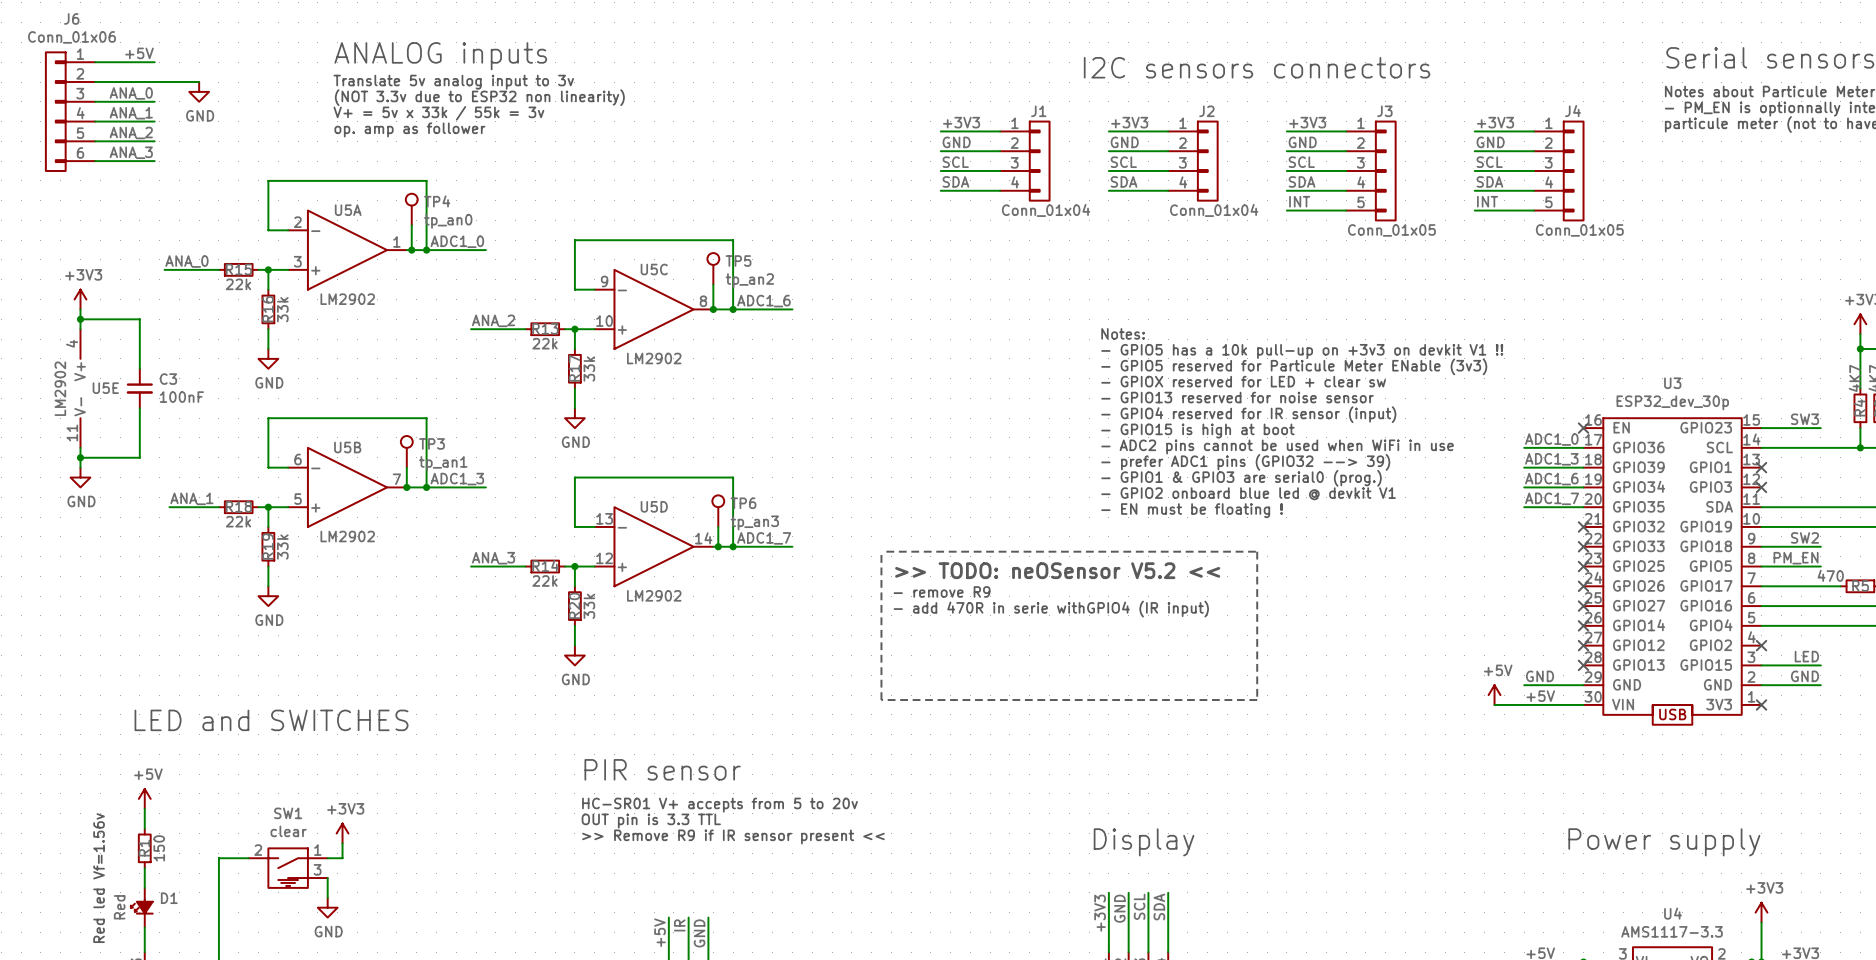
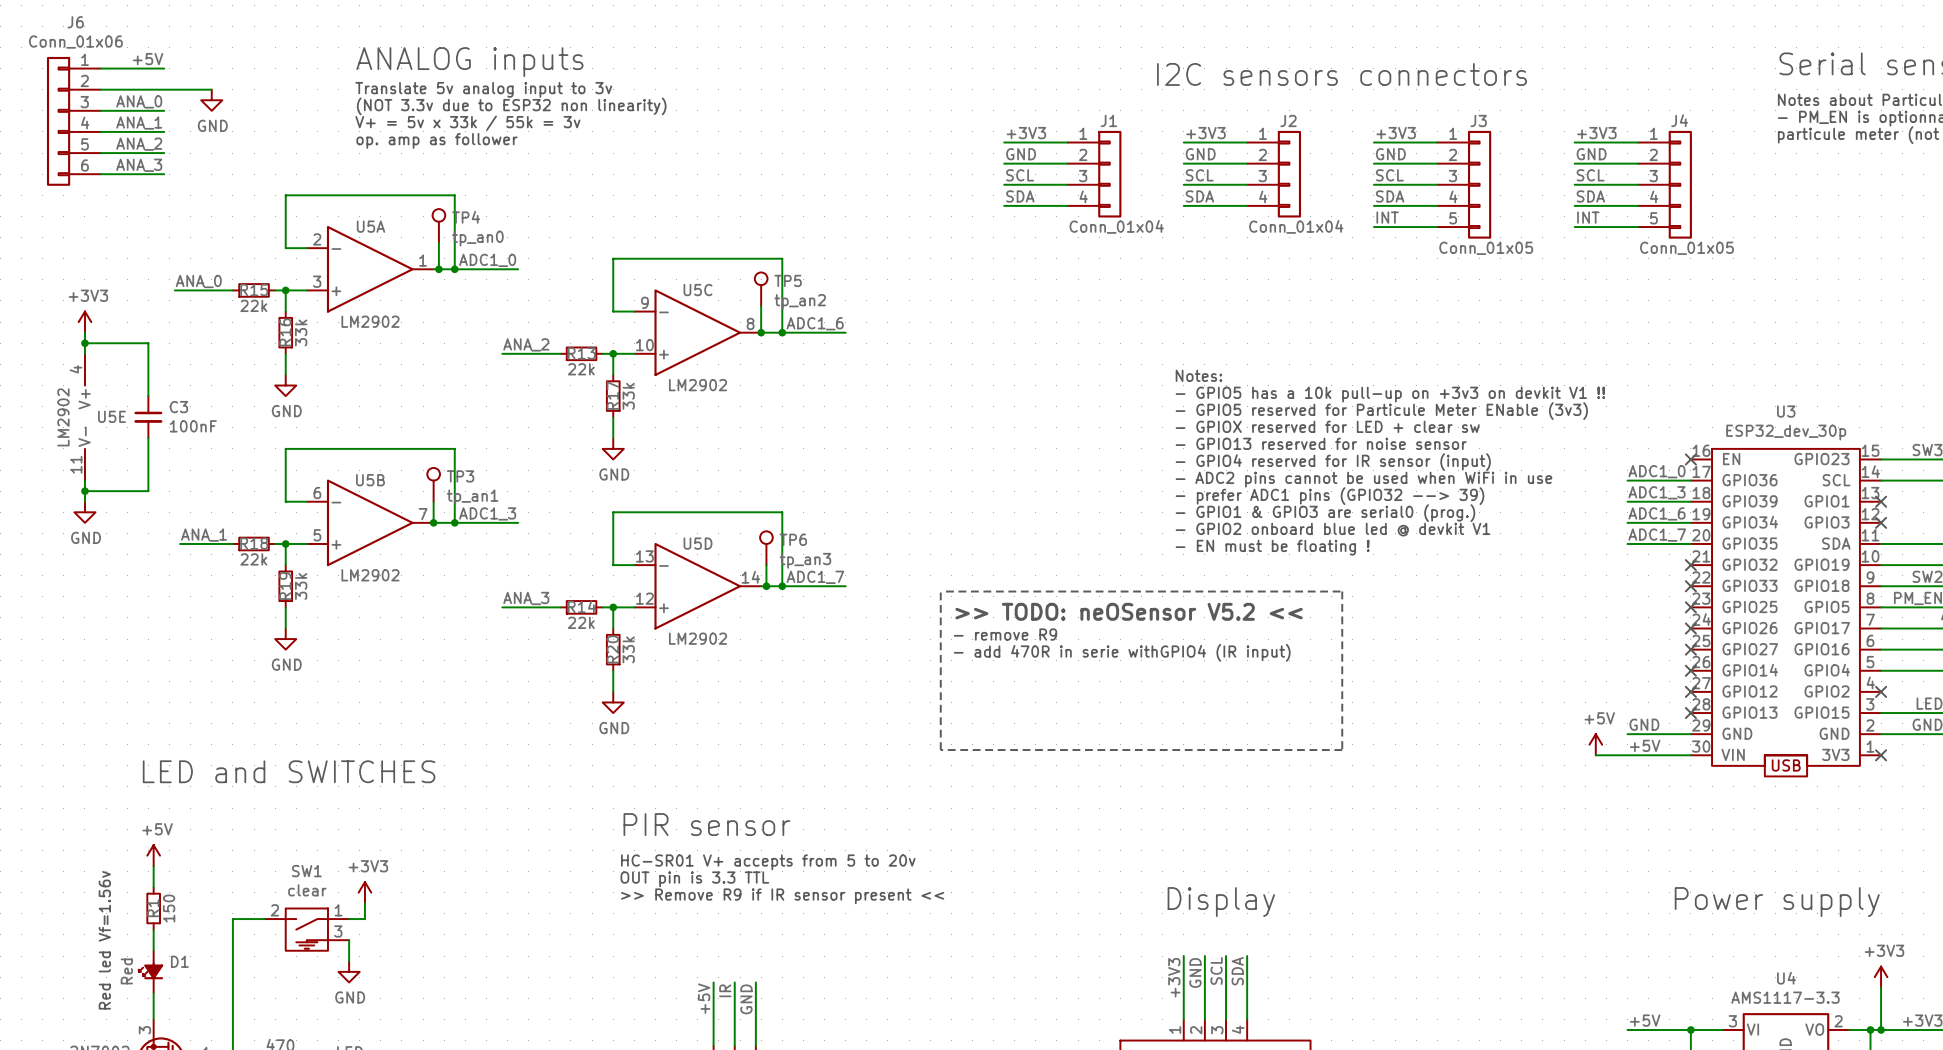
text: Notes: (1123, 333) -> none
text: - GPIO5 has a 10k pull-up on +3v3 on devkit V1 !! (1302, 351) -> Notes: (1198, 375)
text: - GPIO5 reserved for Particule Meter ENable (3v3) (1294, 366) -> - GPIO5 has a 10k pull-up on +3v3 on devkit V1 !! (1390, 394)
text: - GPIOX reserved for LED + clear sw (1243, 381) -> - GPIO5 reserved for Particule Meter ENable (3v3) (1381, 411)
text: - GPIO13 reserved for noise sensor (1237, 397) -> - GPIOX reserved for LED + clear sw (1327, 426)
text: - GPIO4 reserved for IR sensor (input) (1248, 414) -> - GPIO13 reserved for noise sensor (1321, 443)
text: - GPIO15 is high at boot (1197, 431) -> - GPIO4 reserved for IR sensor (input) (1333, 462)

